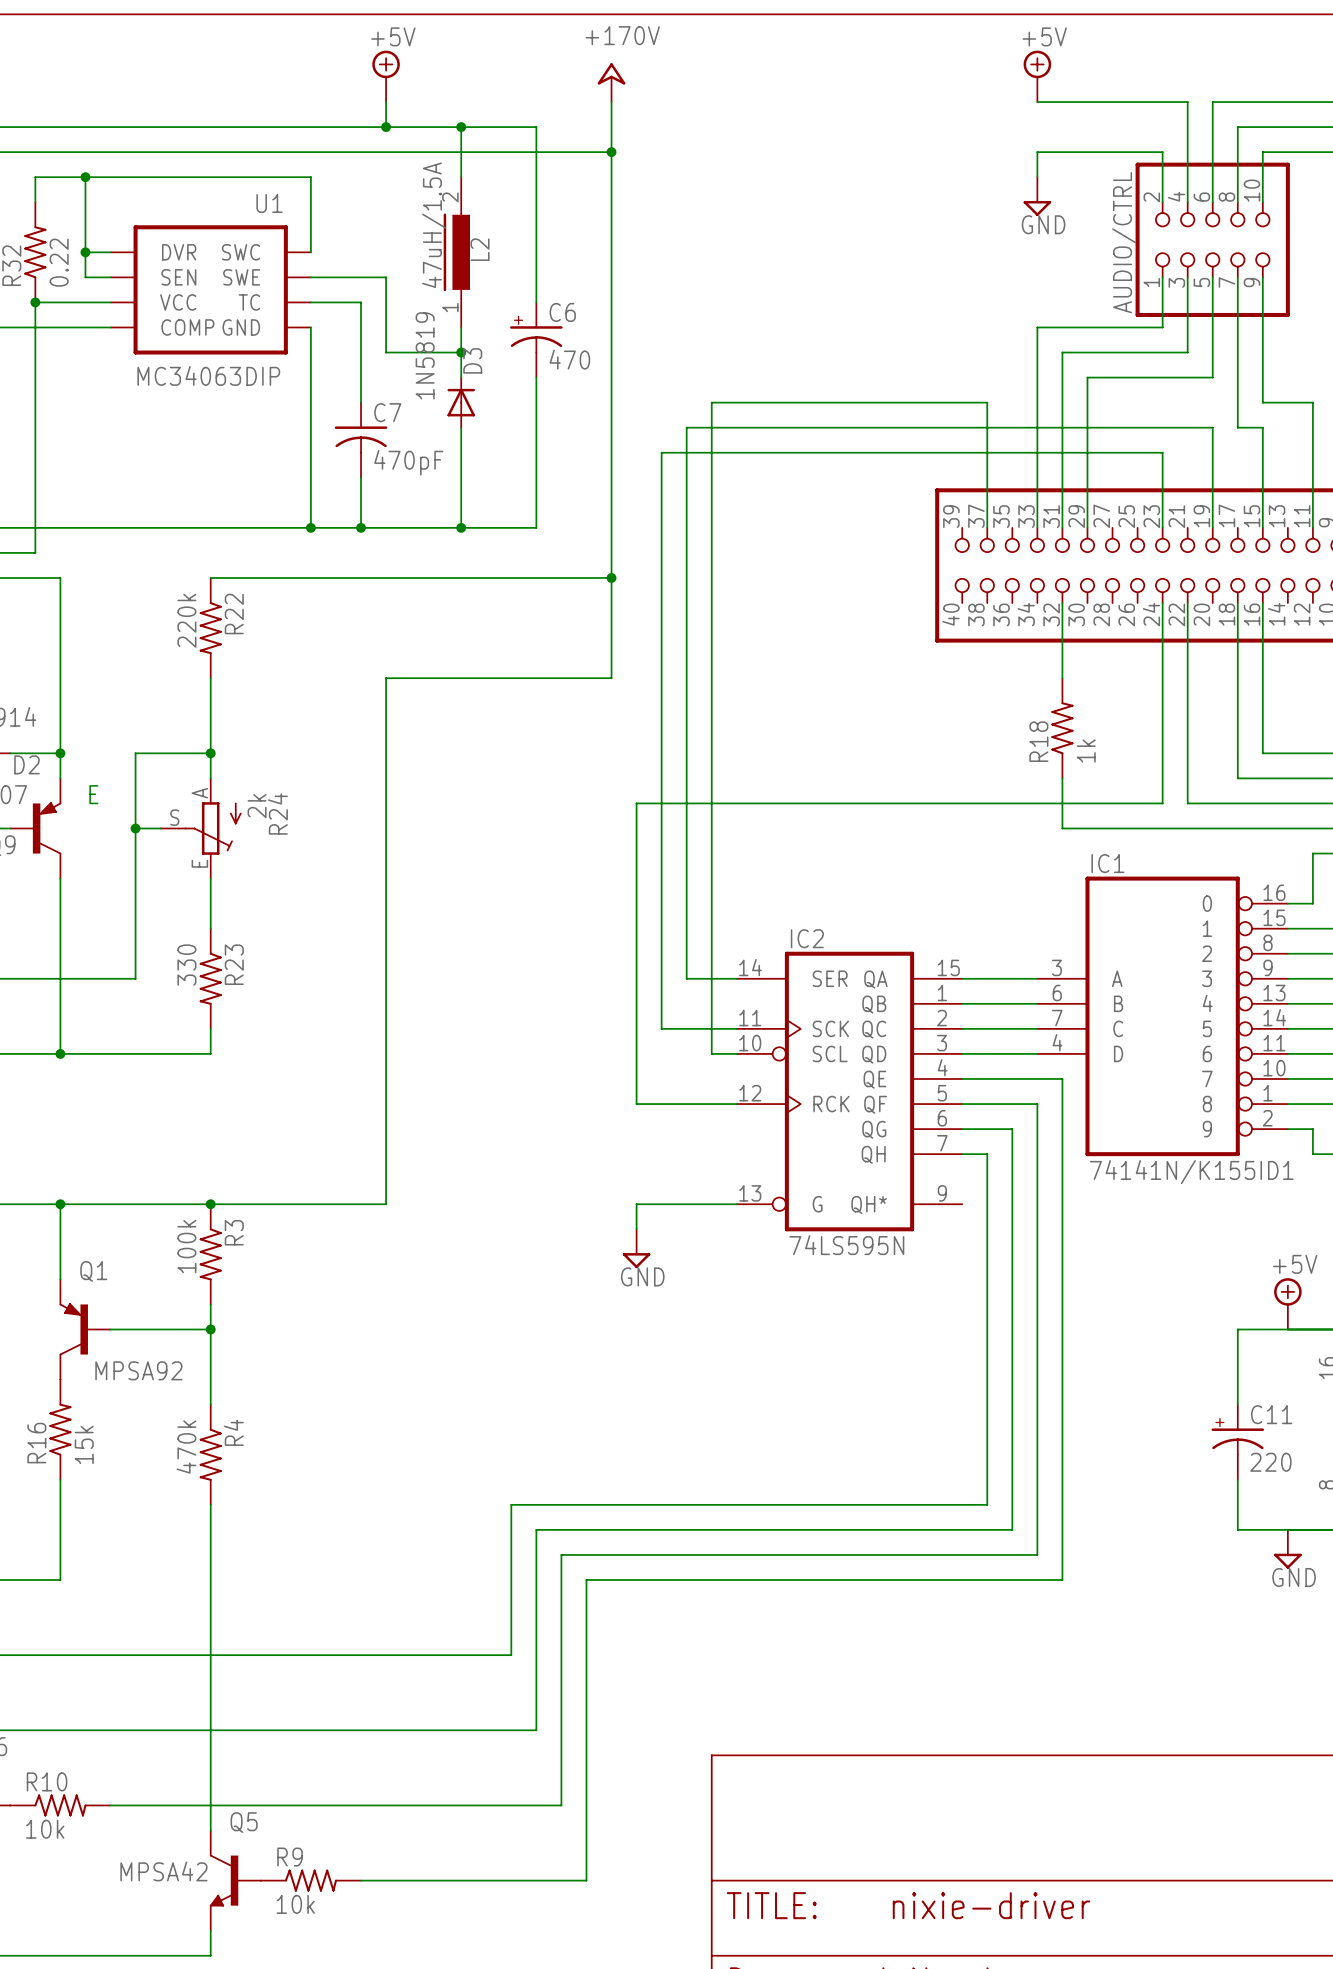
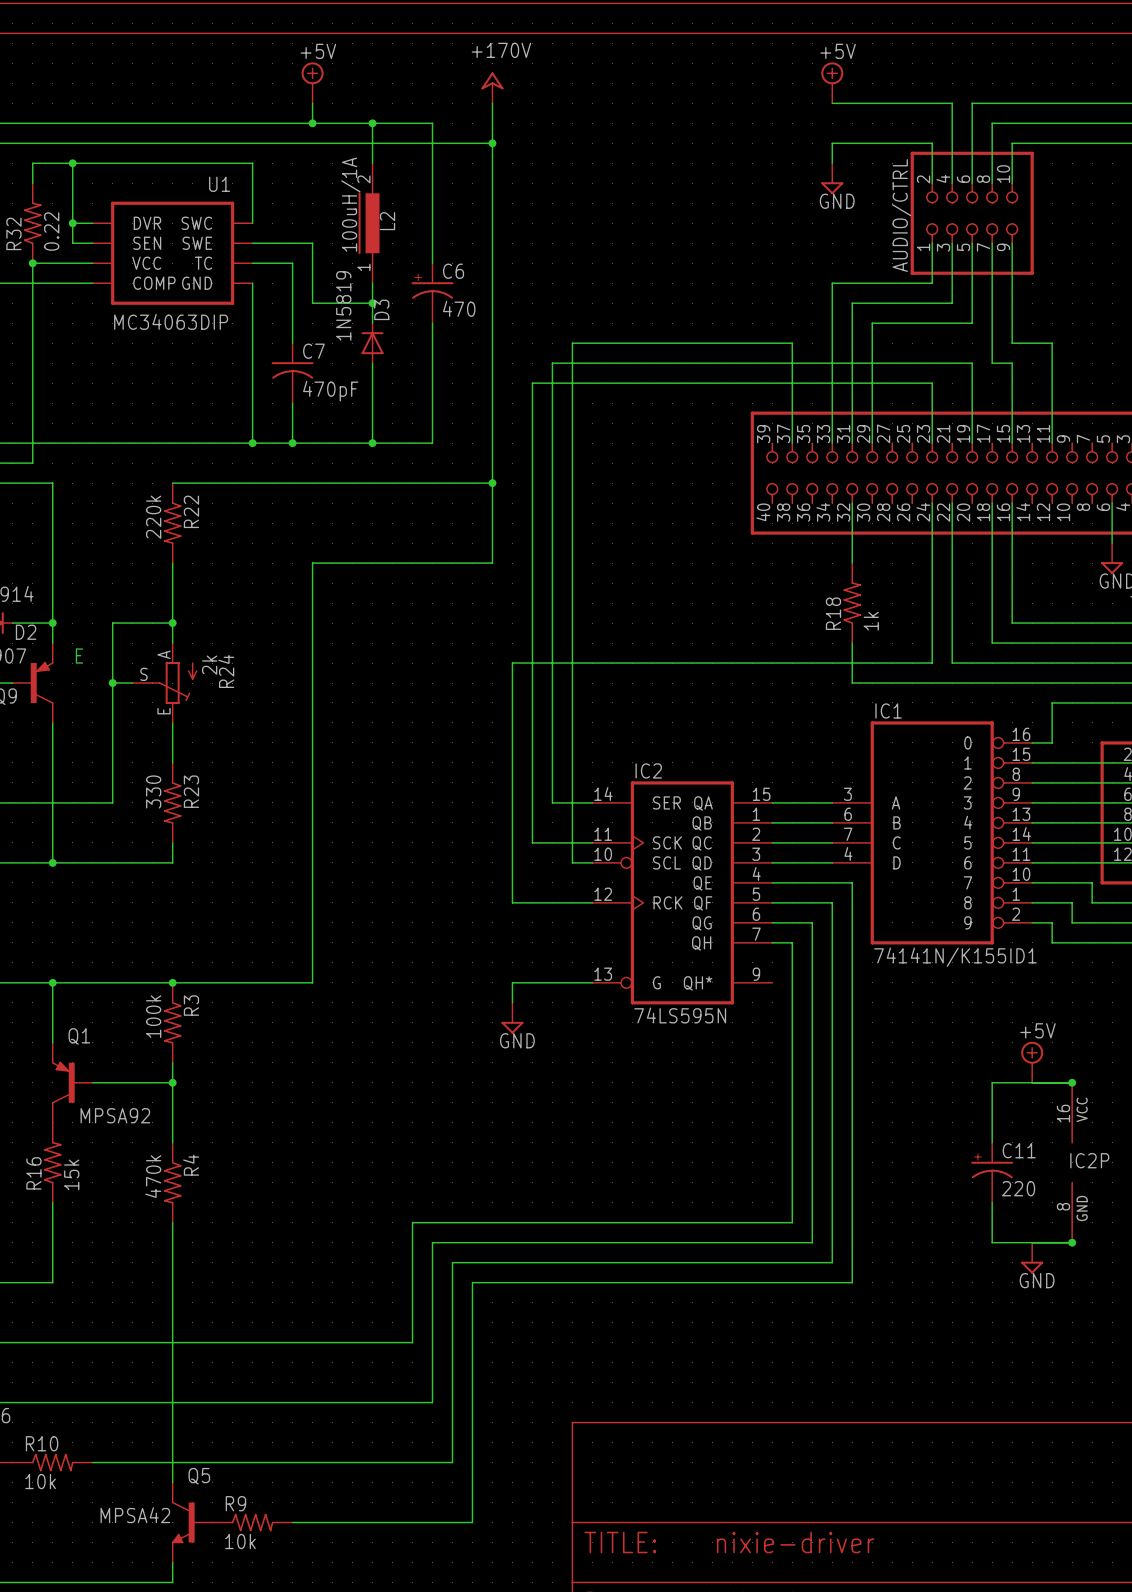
L2 value: 47uH/1.5A (434, 225) -> 100uH/1A (350, 204)

